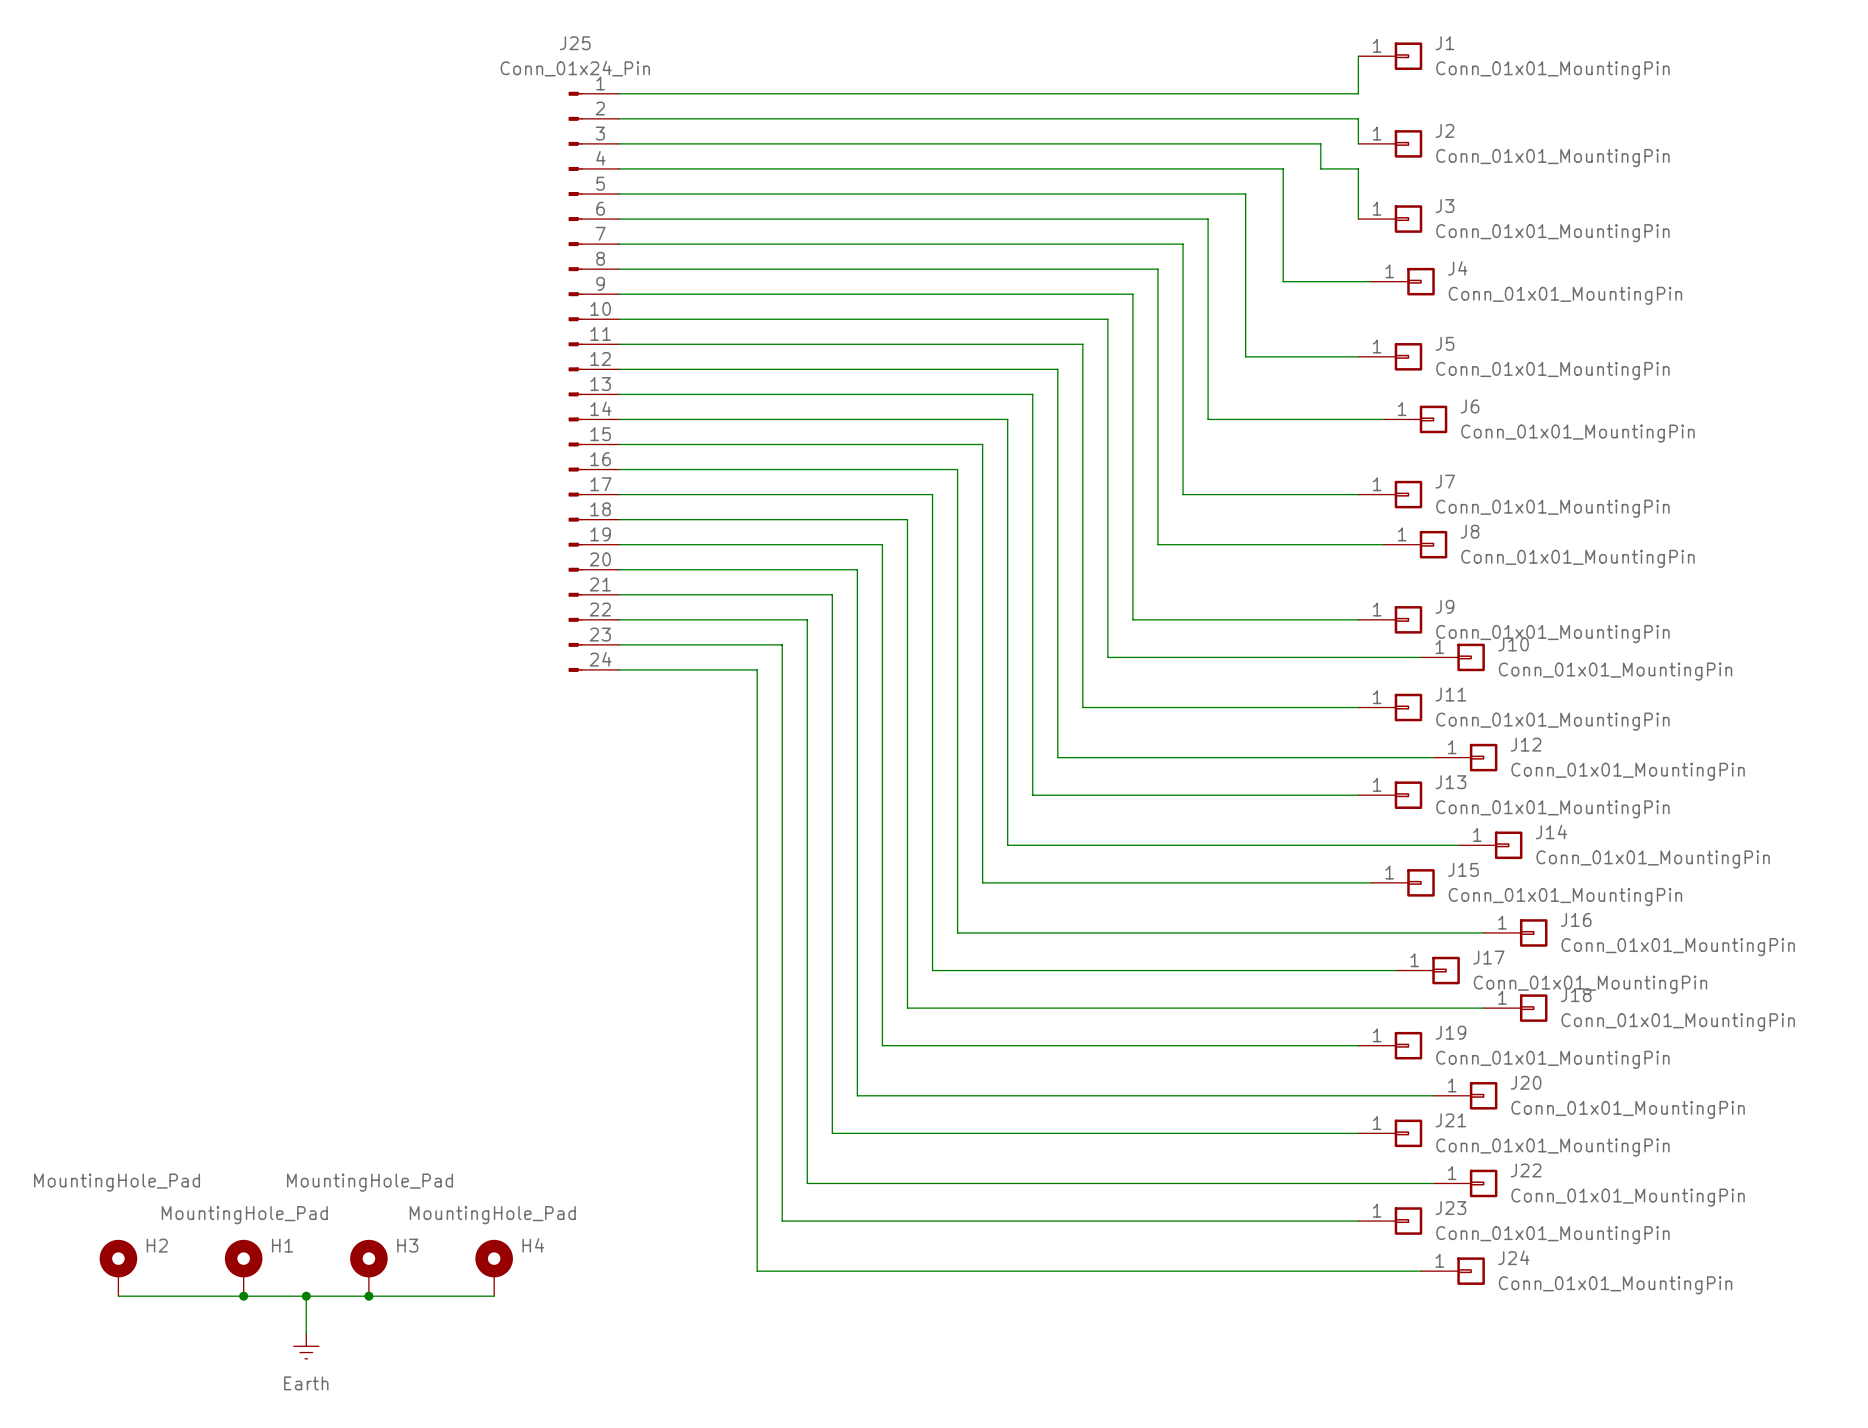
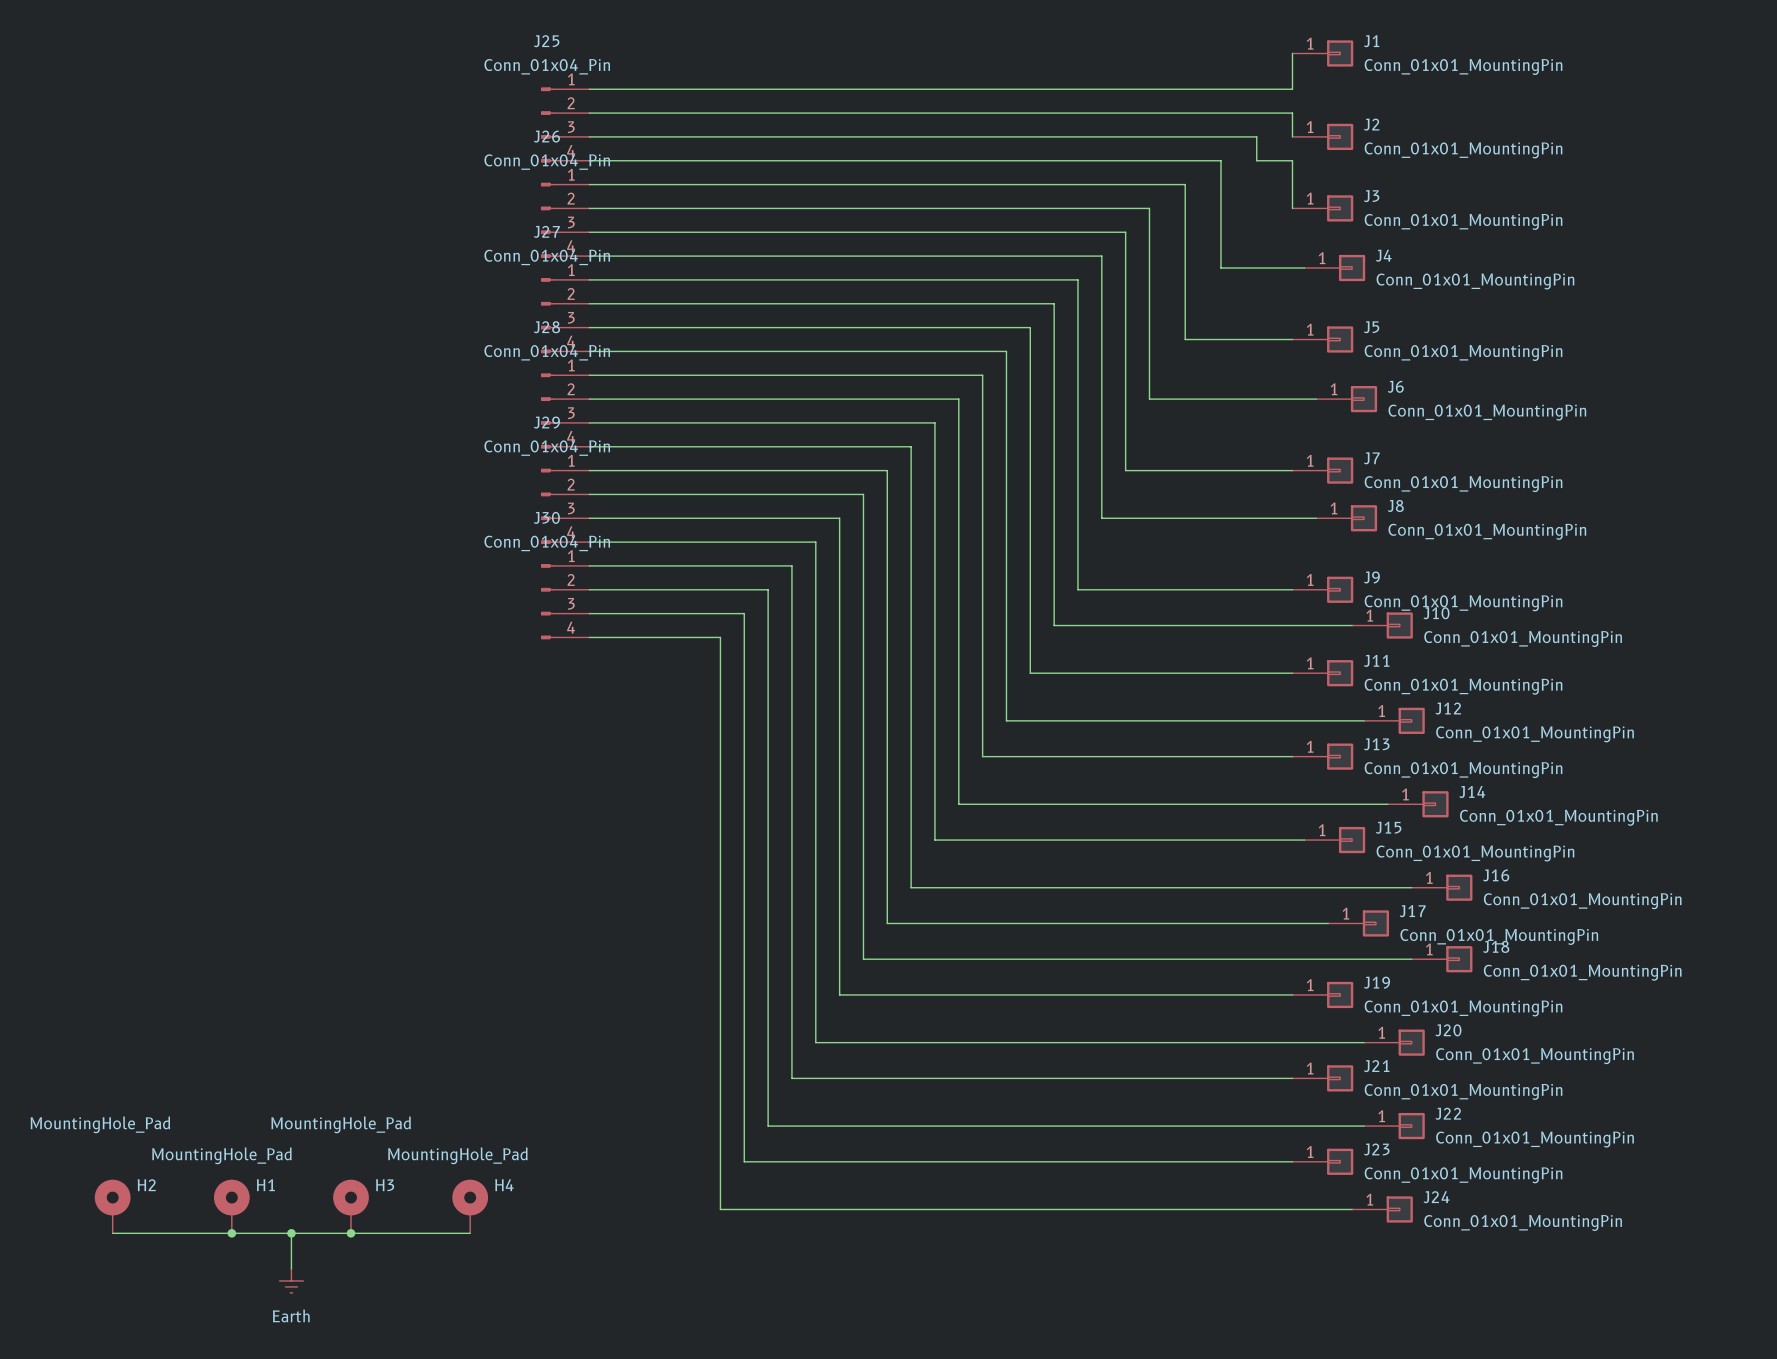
J25 value: Conn_01x24_Pin (575, 68) -> Conn_01x04_Pin (547, 66)
J25 symbol: [568, 91, 620, 672] -> [540, 87, 590, 163]
J26: none -> Conn_01x04_Pin (565, 220)
J27: none -> Conn_01x04_Pin (565, 315)
J28: none -> Conn_01x04_Pin (565, 411)
J29: none -> Conn_01x04_Pin (565, 506)
J30: none -> Conn_01x04_Pin (565, 601)

